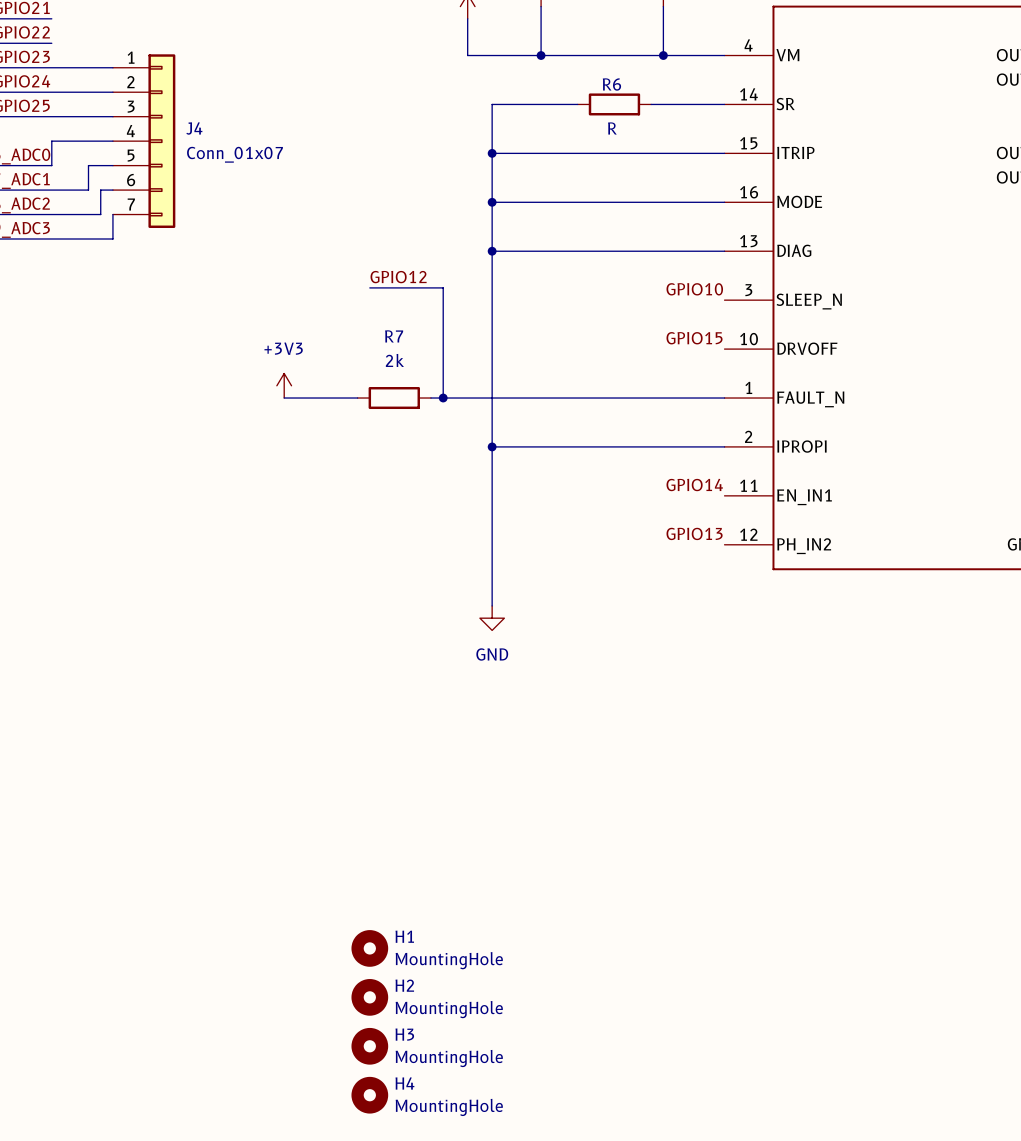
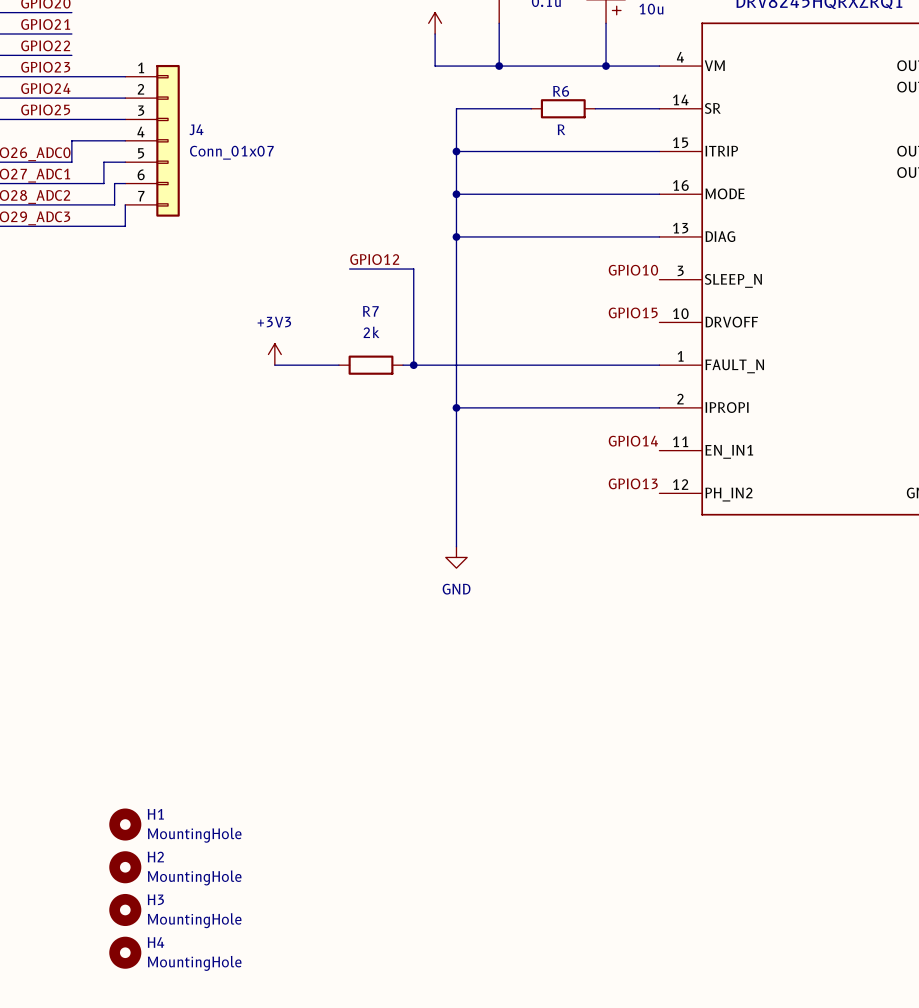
H1 position: (369, 948) -> (125, 824)
H2 position: (369, 997) -> (125, 867)
H3 position: (369, 1046) -> (125, 909)
H4 position: (369, 1095) -> (125, 952)

